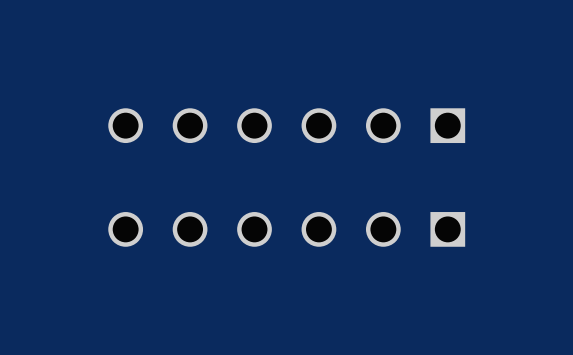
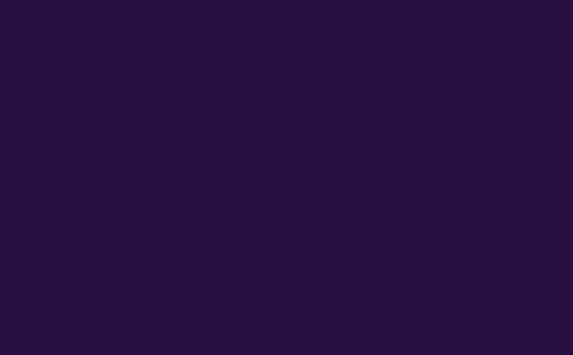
part: (286, 125) -> none
part: (286, 229) -> none

